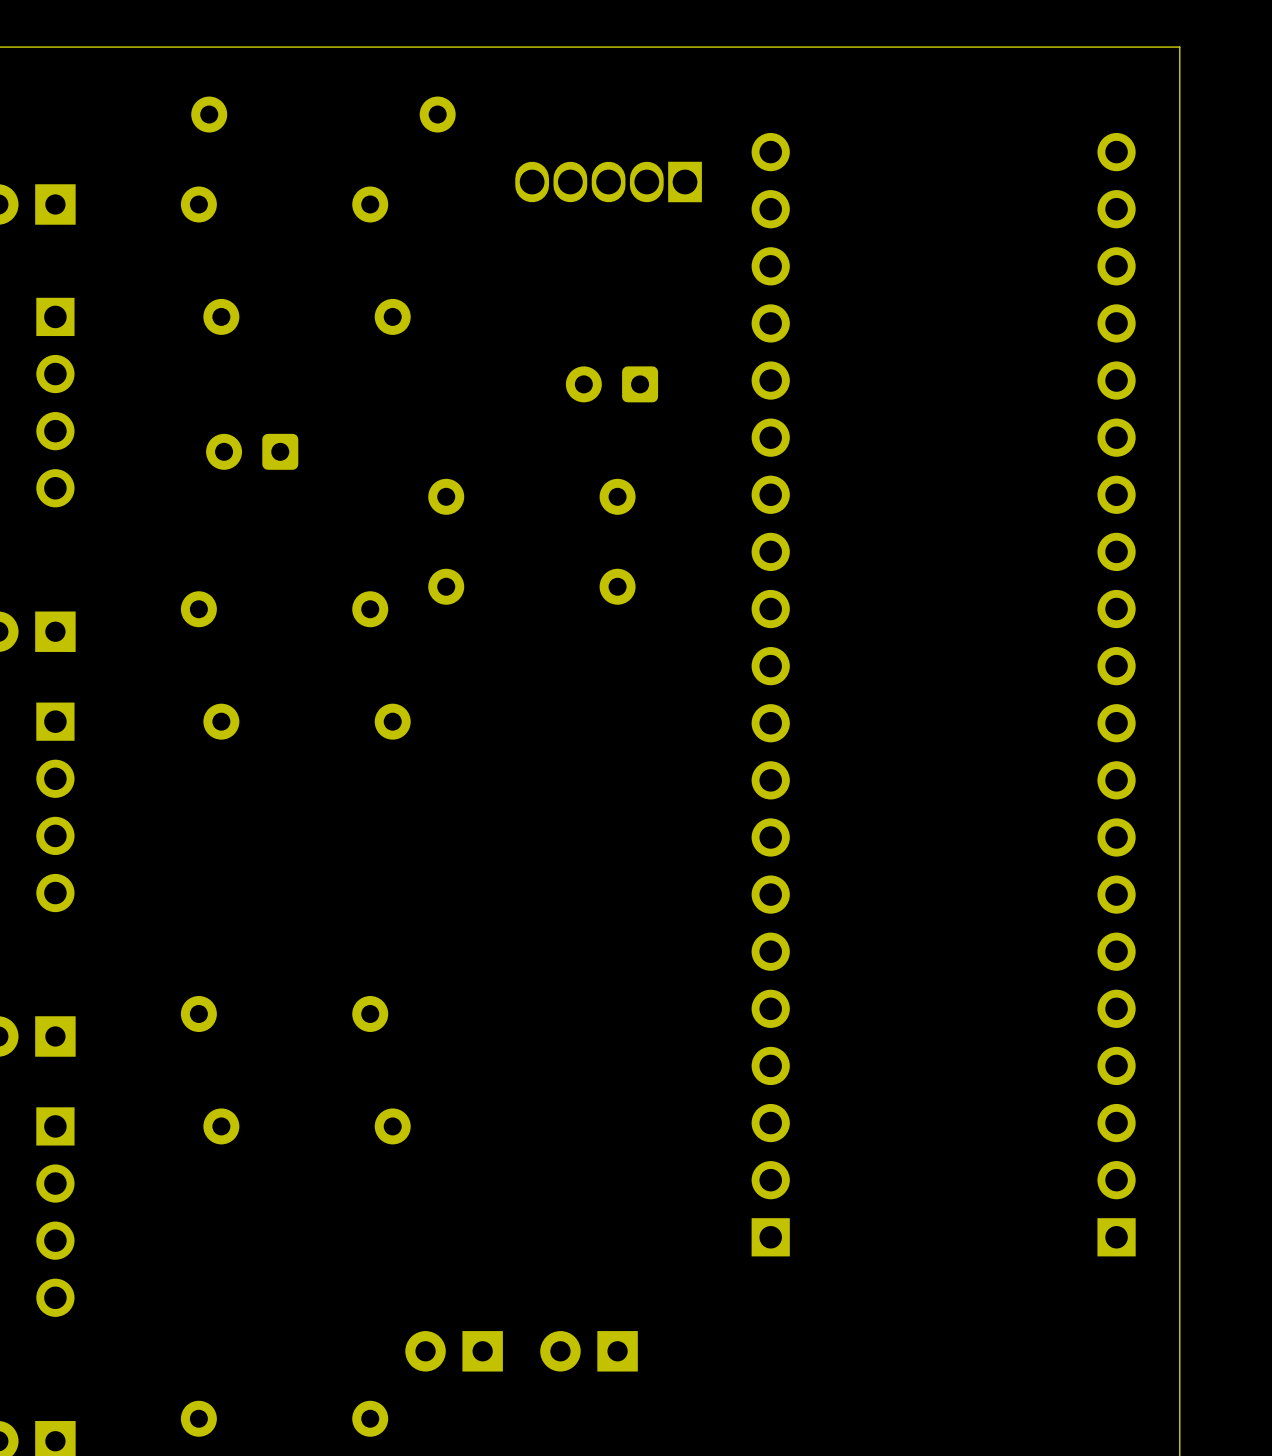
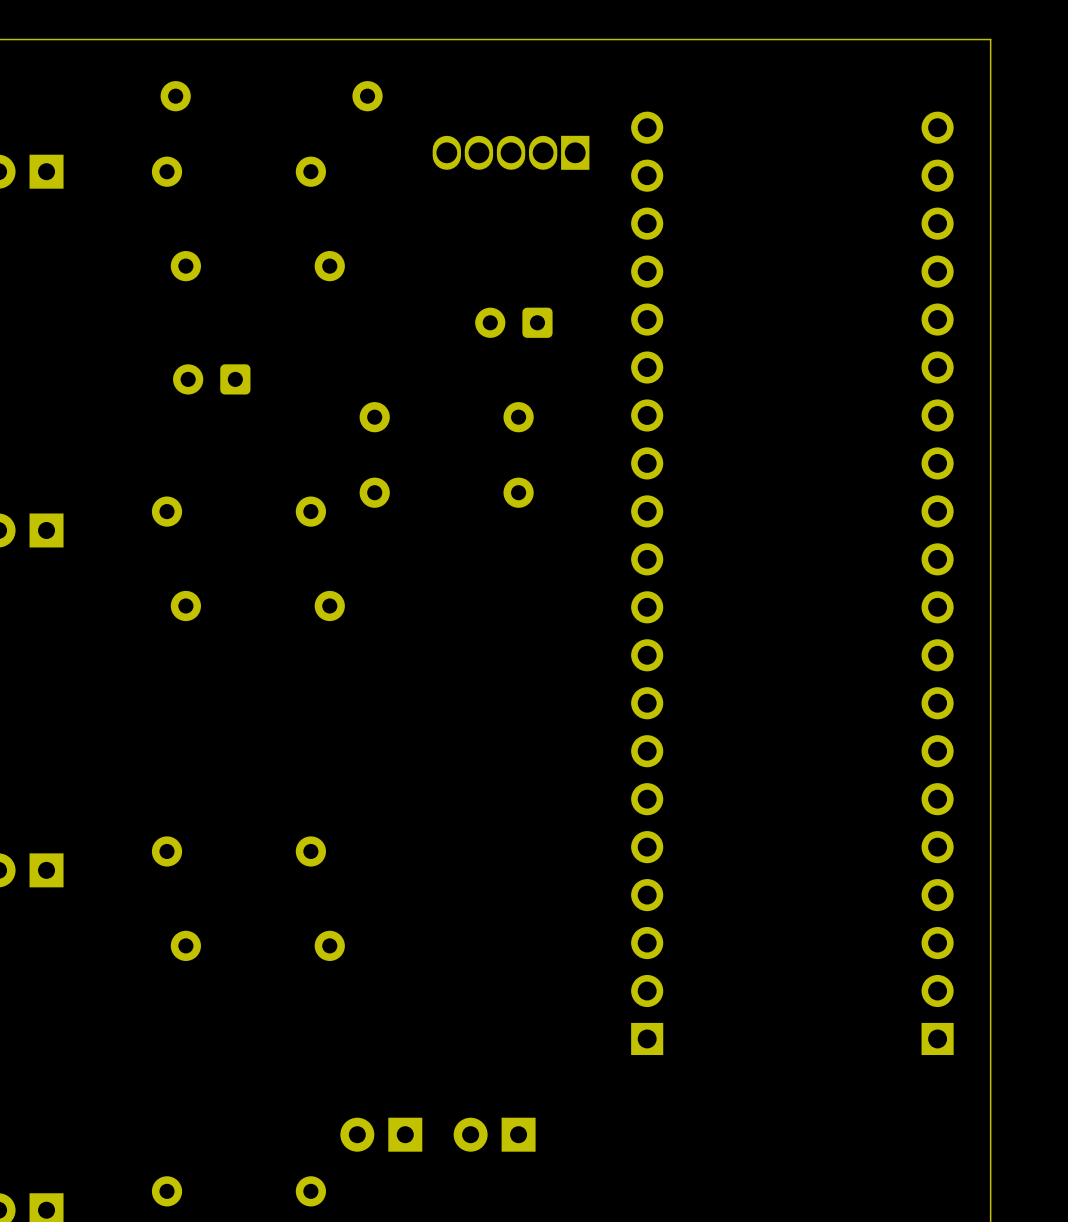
part: (55, 402) -> none
part: (55, 807) -> none
part: (55, 1212) -> none

